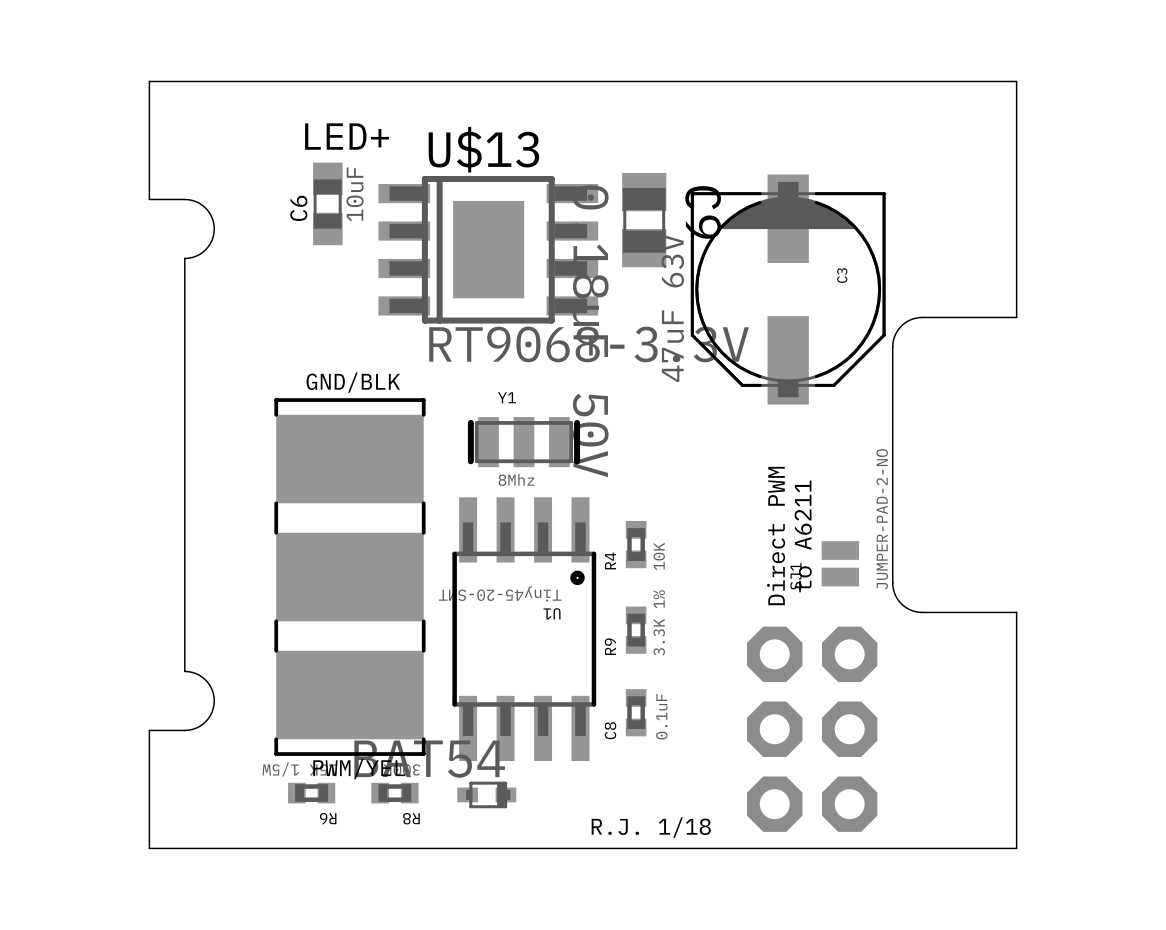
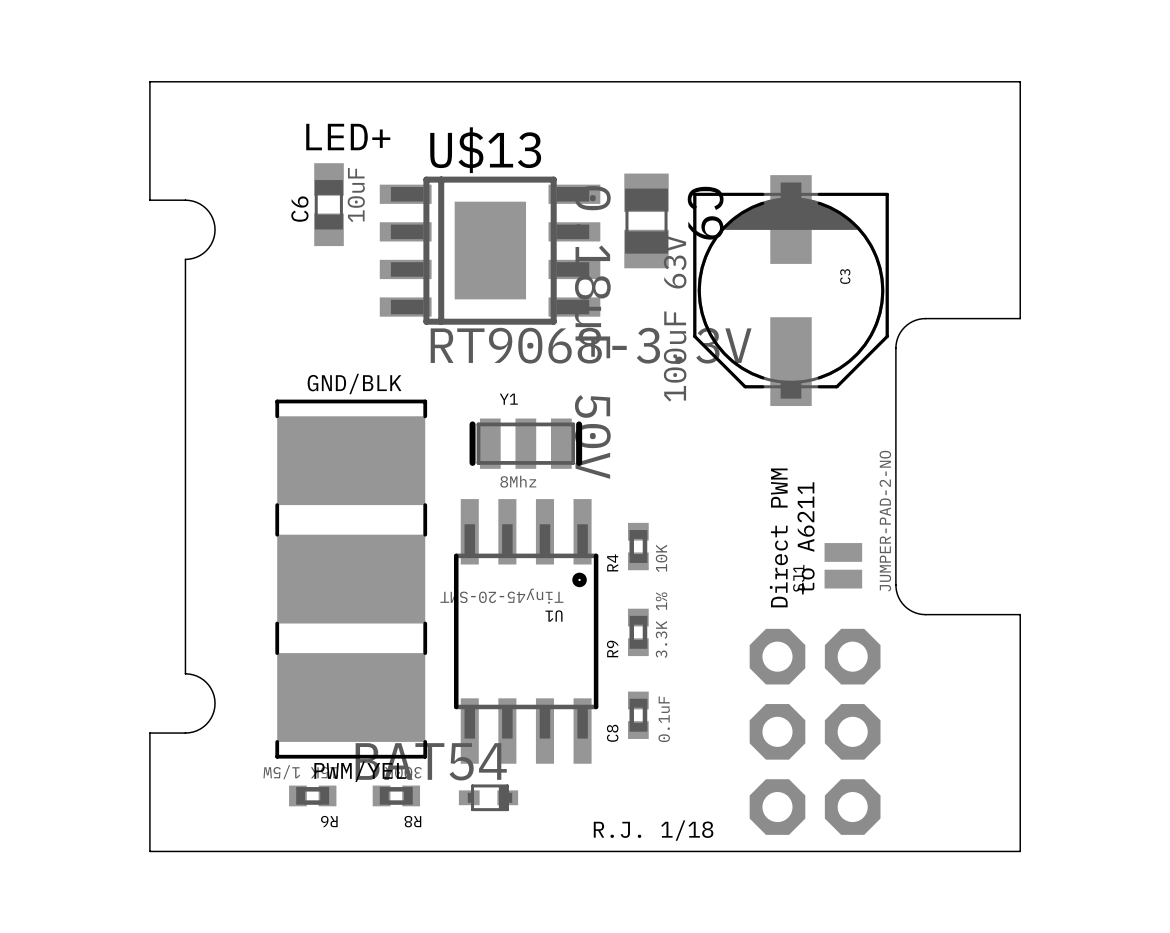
C3 value: 47uF 63V (672, 308) -> 100uF 63V (675, 318)

